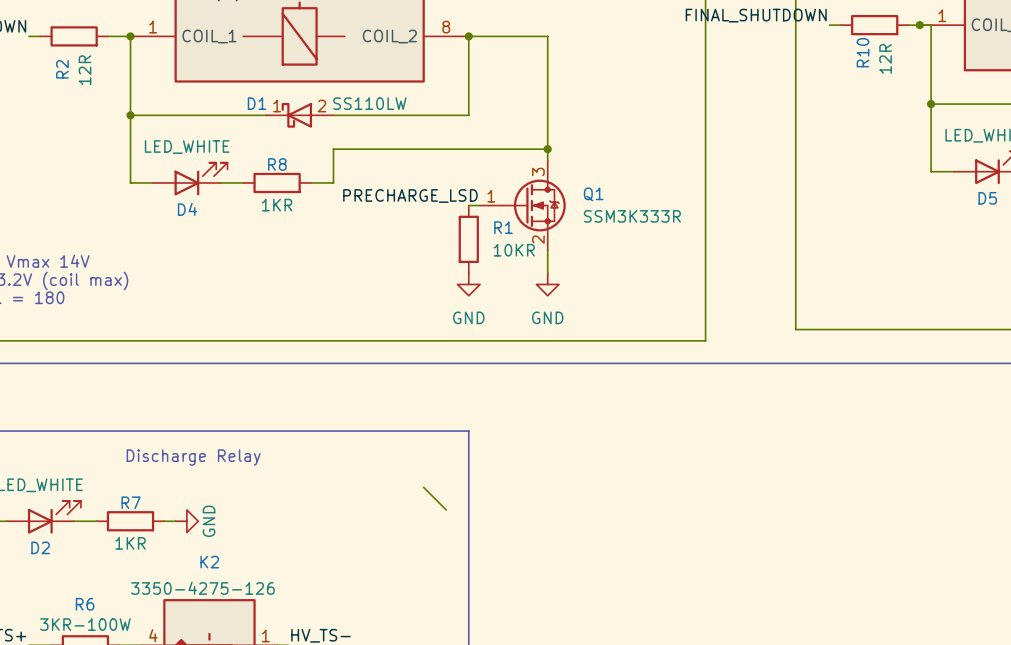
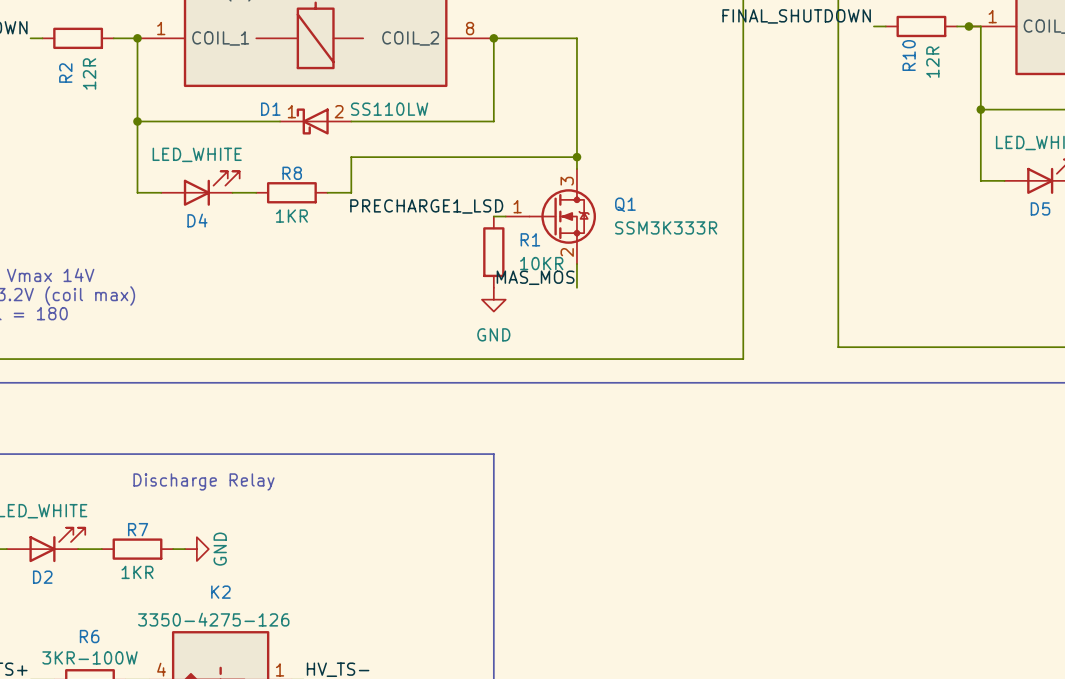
label: PRECHARGE_LSD (410, 196) -> PRECHARGE1_LSD (426, 206)
label: none -> MAS_MOS (535, 277)
power symbol: GND (547, 284) -> none
wire: (423, 487) (446, 509) -> none

